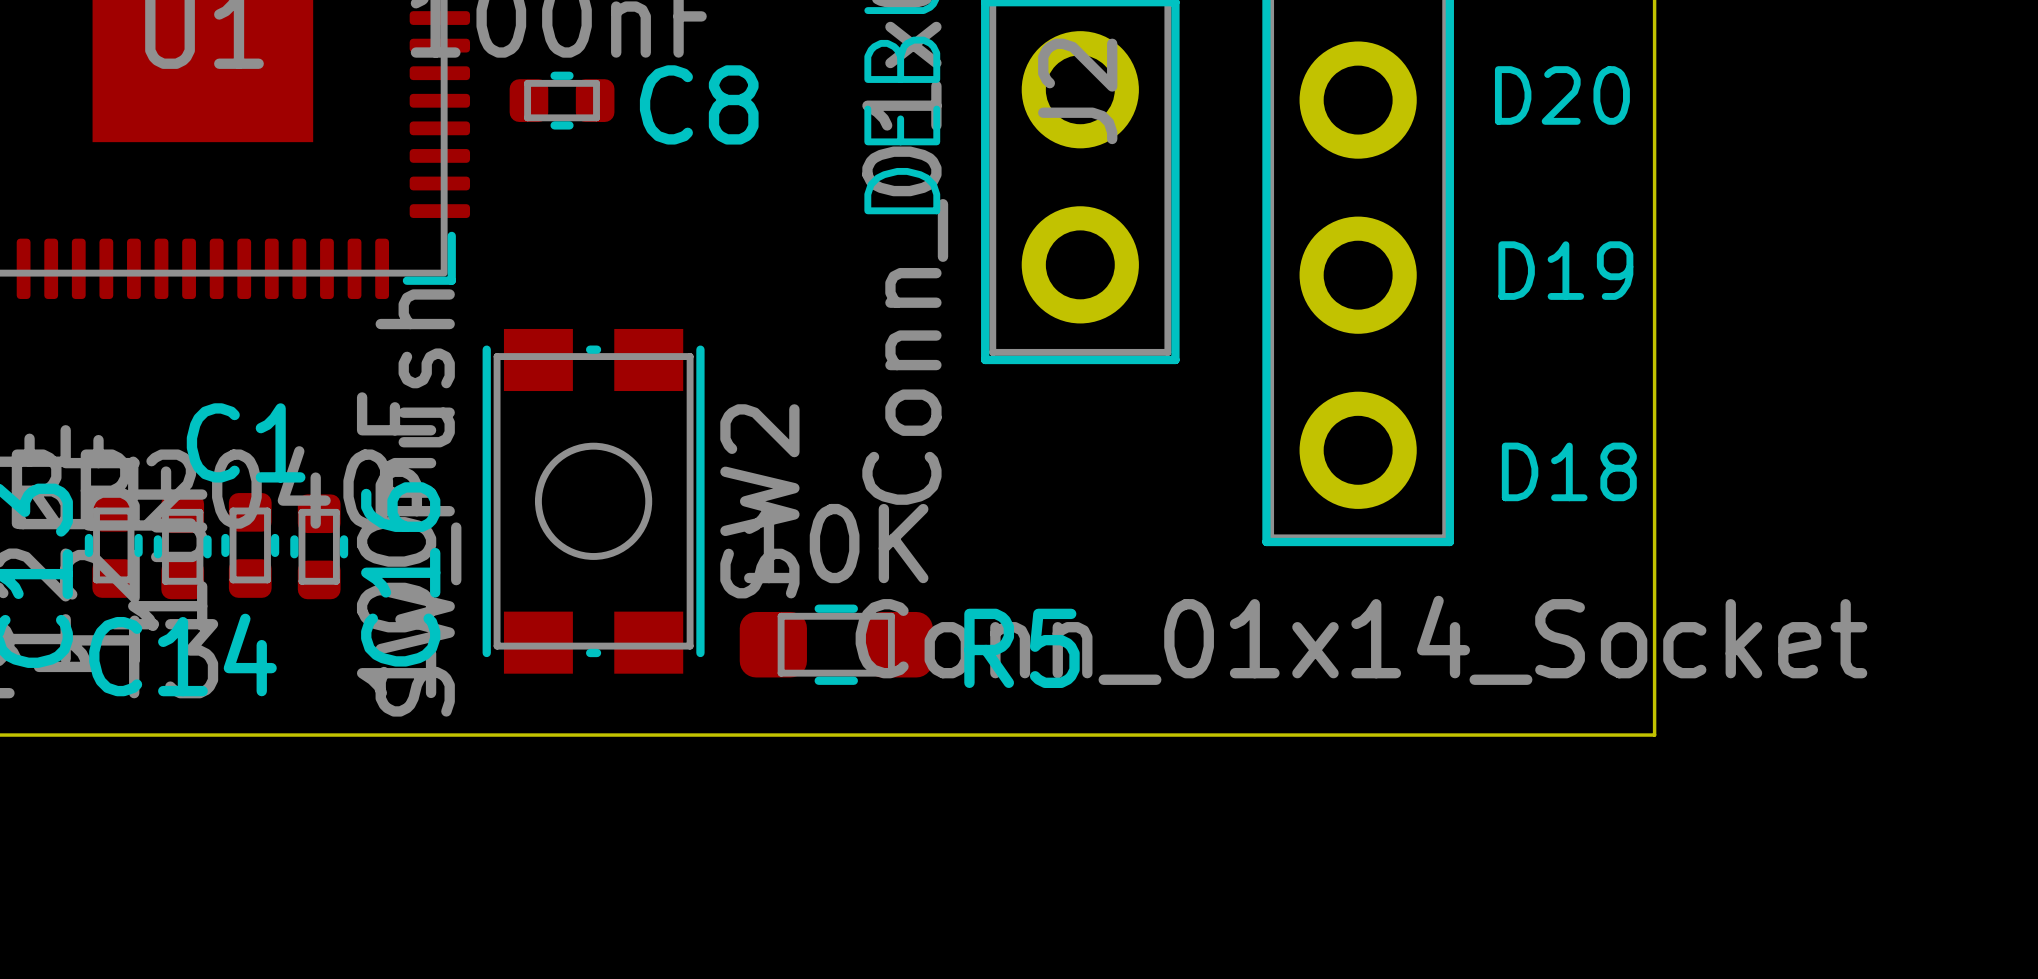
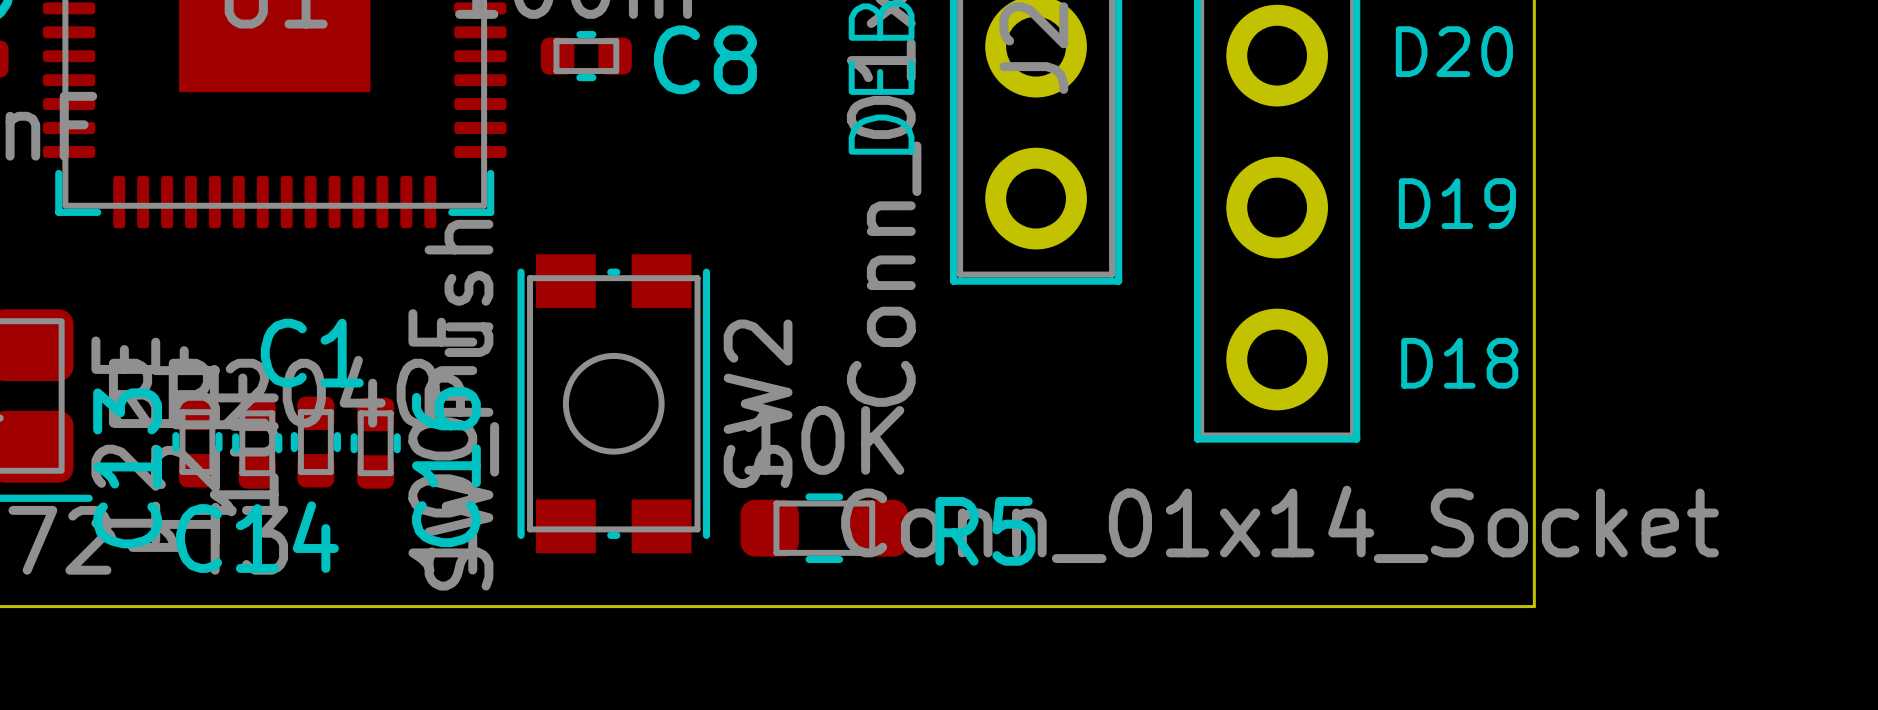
text position: D18 (1569, 471) -> D18 (1459, 363)

